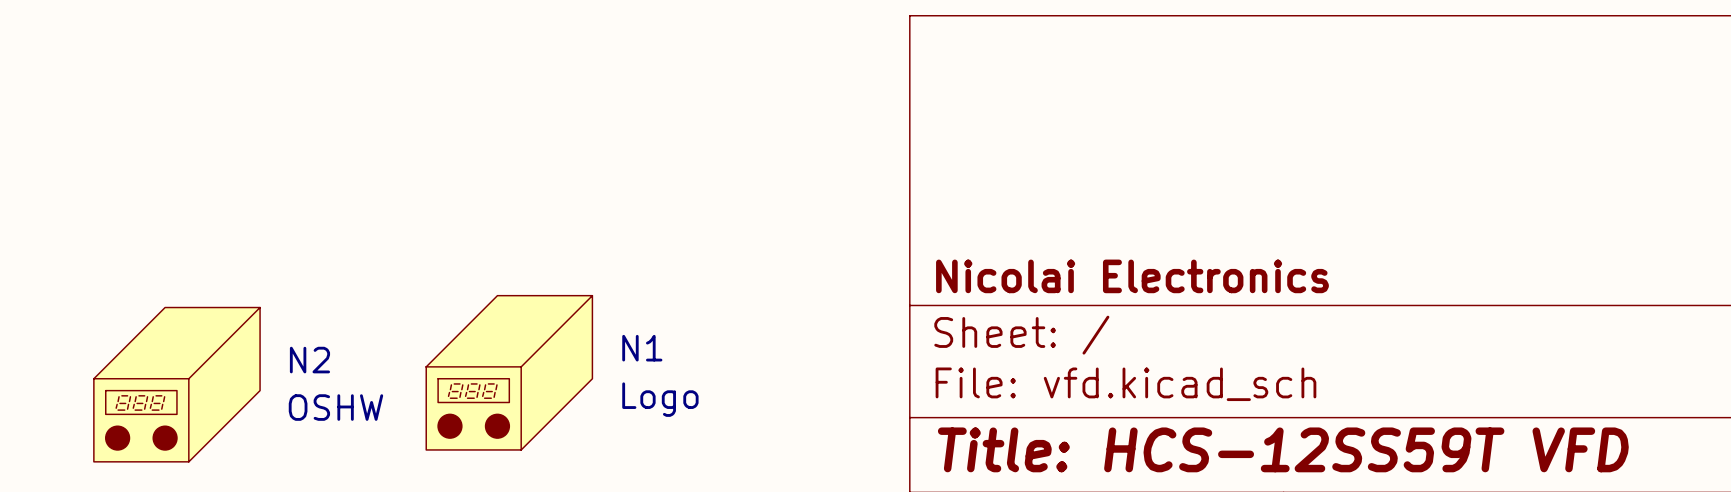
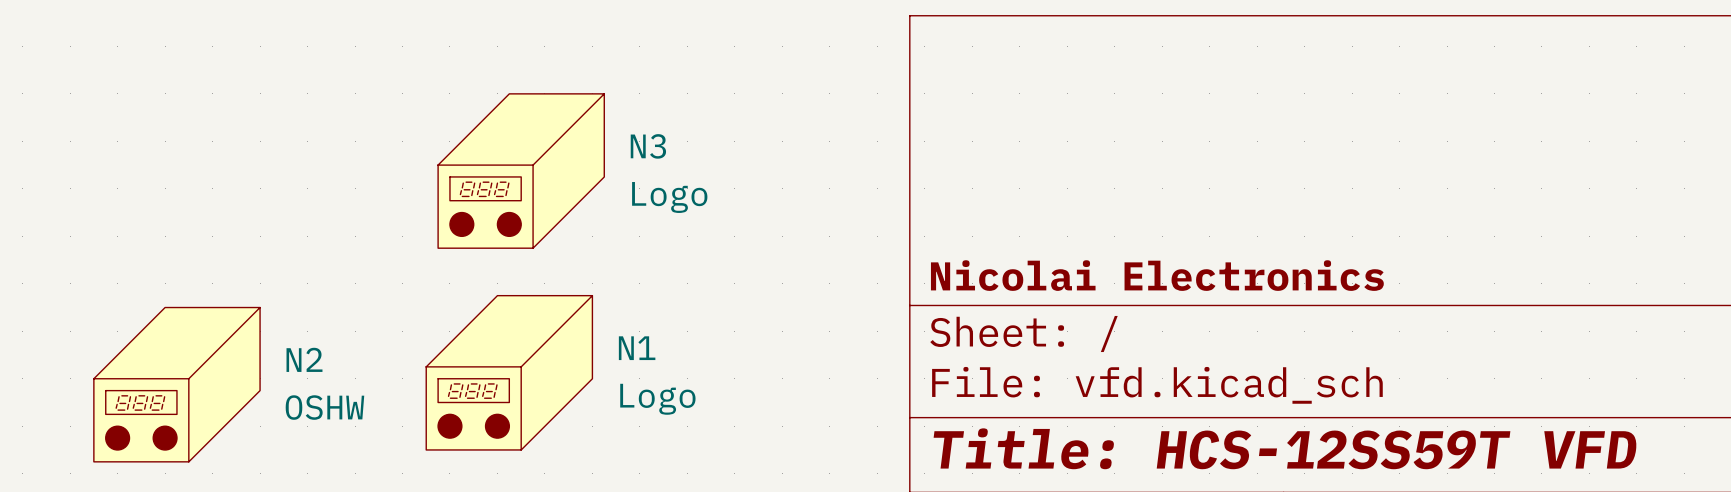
N3: none -> Logo (521, 171)

